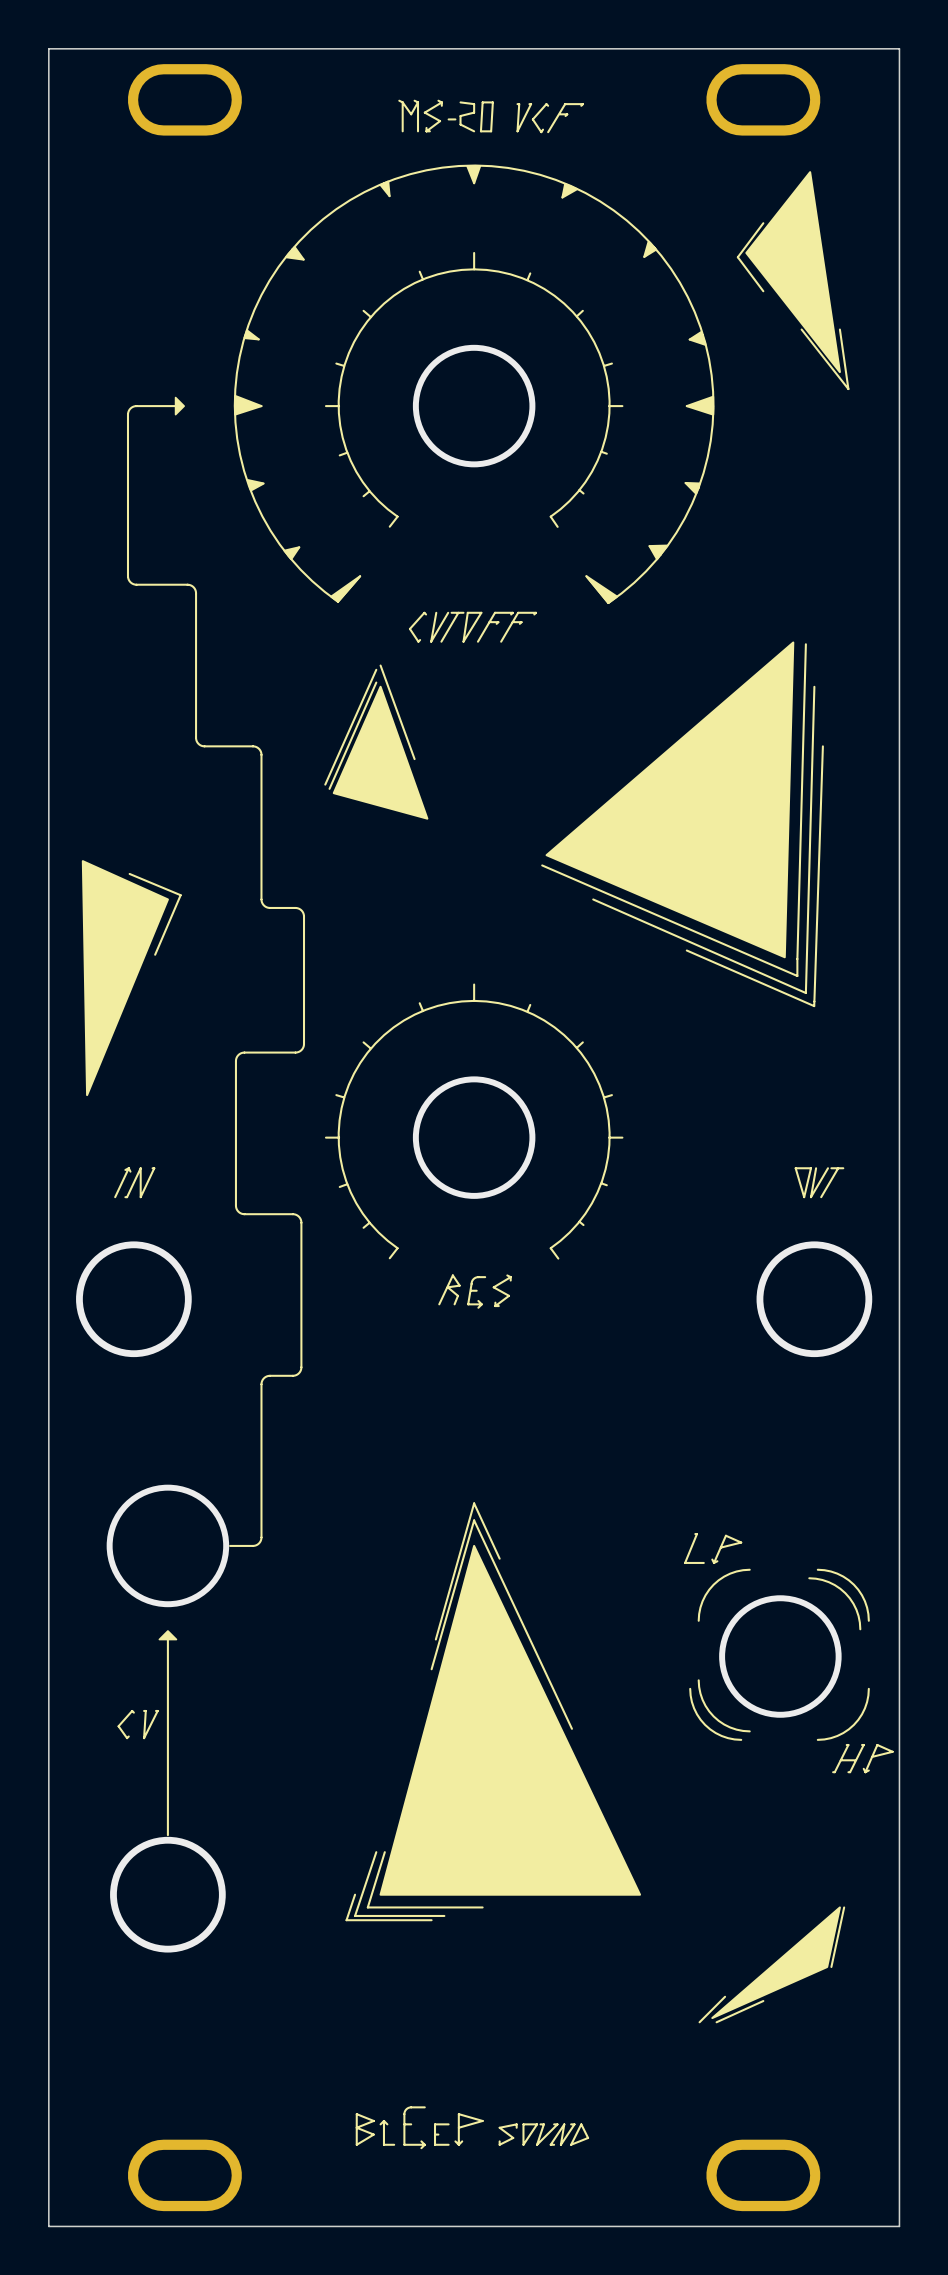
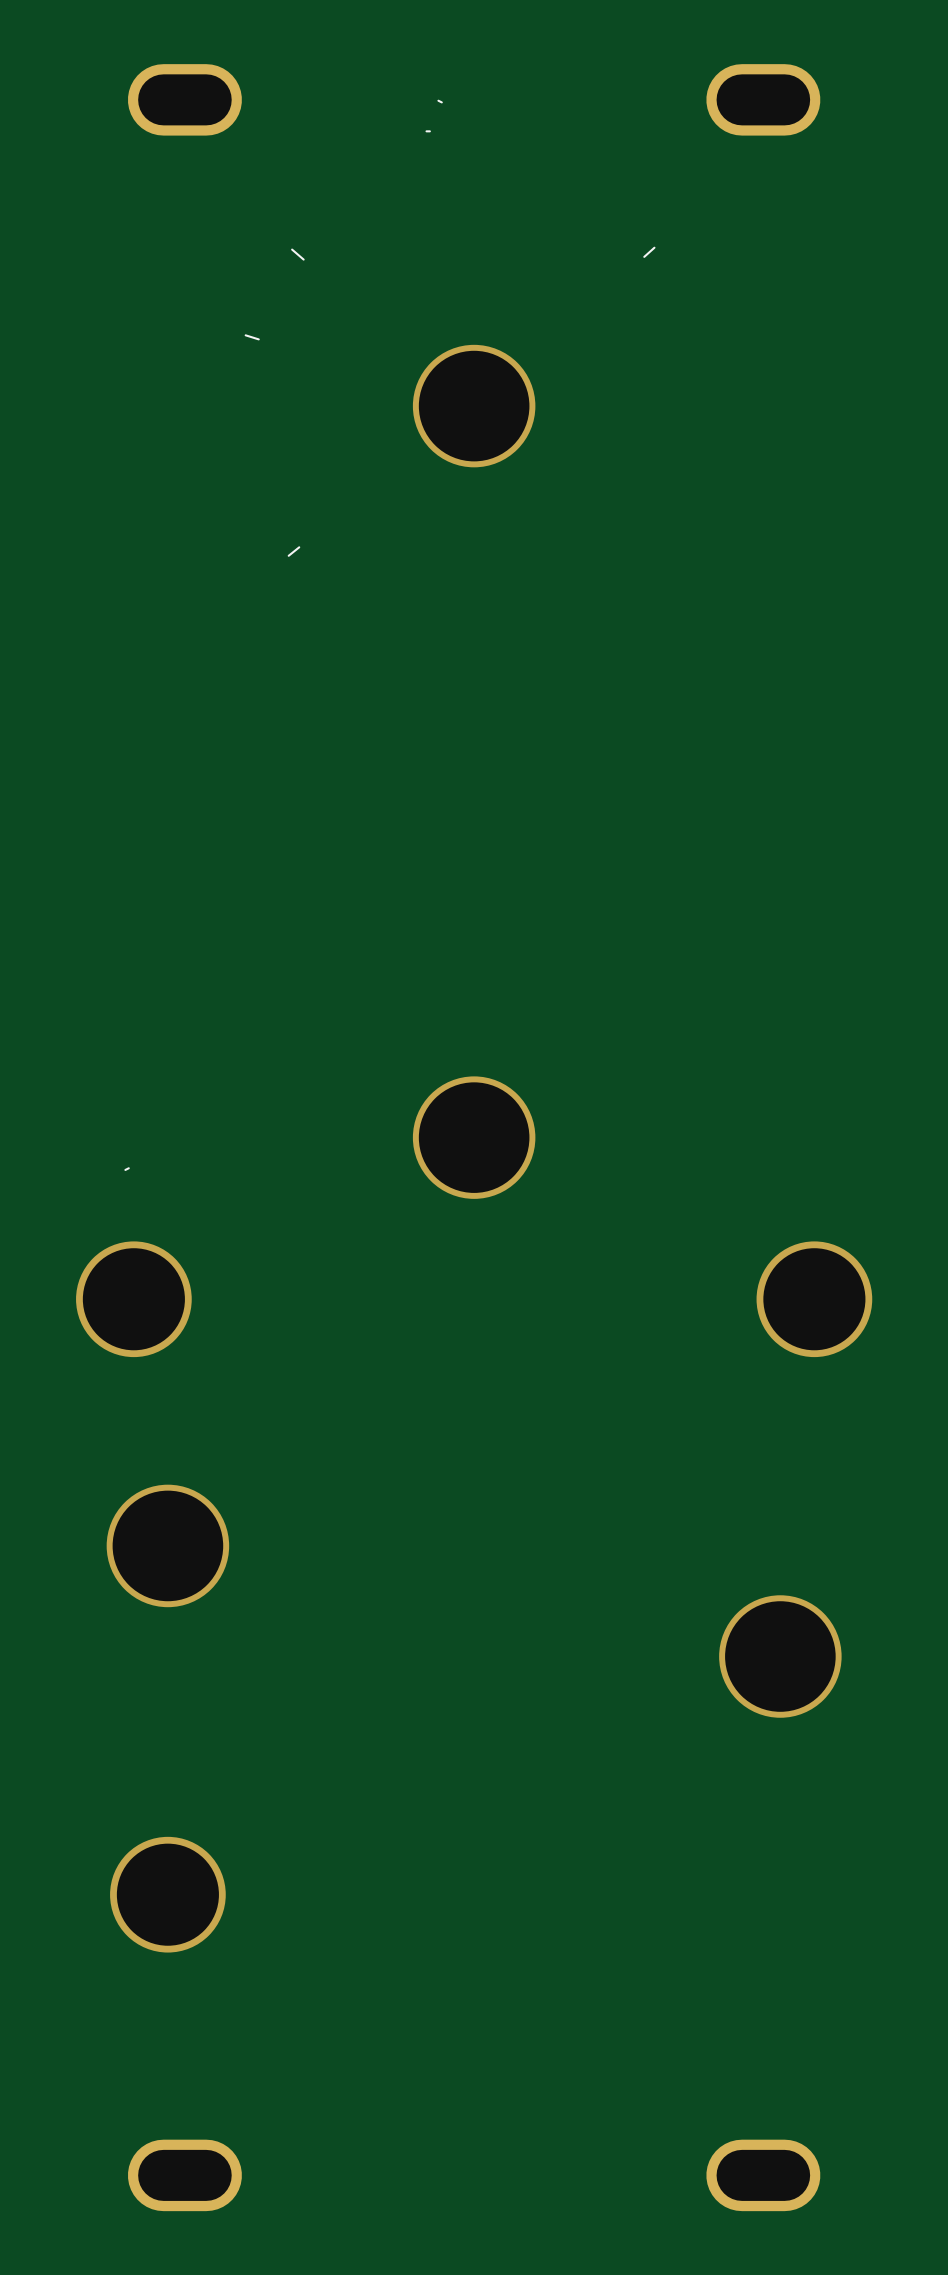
board edge: (48, 48) (48, 2226) (899, 2226) (899, 48) (48, 48) -> none
line: (399, 100) (402, 102) -> none
line: (414, 100) (418, 102) -> none
line: (402, 102) (402, 131) -> none
line: (402, 102) (411, 114) (418, 102) -> none
line: (418, 102) (418, 131) -> none
line: (460, 102) (474, 104) (474, 112) (460, 116) (460, 124) (474, 131) -> none
line: (482, 102) (492, 102) (491, 131) (480, 131) (482, 102) -> none
line: (517, 104) (519, 104) (517, 131) (531, 104) (529, 104) -> none
line: (441, 105) (441, 102) (424, 112) (440, 121) (426, 131) (426, 127) -> none
line: (548, 105) (546, 104) (532, 119) (541, 132) (543, 129) -> none
line: (581, 105) (583, 104) (565, 104) (548, 132) -> none
line: (560, 114) (567, 114) (565, 116) -> none
line: (448, 119) (455, 119) -> none
drawing: [466, 165, 482, 185] -> none
drawing: [745, 171, 841, 374] -> none
drawing: [379, 180, 391, 198] -> none
drawing: [561, 183, 579, 199] -> none
line: (763, 223) (737, 257) (763, 291) -> none
drawing: [643, 240, 658, 258] -> none
drawing: [285, 246, 305, 261] -> none
line: (474, 252) (474, 269) -> none
line: (419, 271) (422, 279) -> none
line: (530, 273) (527, 279) -> none
line: (363, 310) (370, 316) -> none
line: (582, 310) (576, 316) -> none
drawing: [243, 329, 260, 341] -> none
line: (801, 329) (848, 389) (839, 329) -> none
drawing: [688, 331, 707, 346] -> none
line: (336, 363) (344, 365) -> none
line: (611, 363) (604, 365) -> none
drawing: [234, 394, 263, 416] -> none
drawing: [685, 395, 715, 416] -> none
drawing: [174, 396, 185, 416] -> none
line: (175, 406) (135, 406) (128, 412) (128, 578) (135, 584) (188, 584) (194, 588) (196, 740) (203, 746) (254, 746) (260, 750) (261, 901) (268, 907) (298, 908) (304, 916) (303, 1047) (296, 1052) (243, 1052) (238, 1055) (236, 1059) (236, 1207) (243, 1214) (294, 1214) (300, 1219) (301, 1367) (296, 1375) (268, 1375) (262, 1381) (261, 1538) (255, 1545) (230, 1545) -> none
line: (325, 406) (339, 406) -> none
line: (609, 406) (622, 406) -> none
line: (601, 451) (606, 453) -> none
line: (347, 452) (339, 455) -> none
drawing: [246, 479, 265, 492] -> none
drawing: [684, 481, 701, 495] -> none
line: (579, 490) (583, 493) -> none
line: (369, 491) (363, 496) -> none
line: (389, 526) (397, 516) (378, 501) (362, 482) (350, 460) (342, 437) (338, 401) (344, 364) (360, 331) (375, 312) (393, 295) (426, 278) (449, 271) (474, 269) (510, 274) (533, 283) (554, 295) (572, 312) (588, 331) (603, 364) (609, 401) (605, 437) (597, 460) (585, 482) (569, 501) (550, 516) (557, 526) -> none
drawing: [648, 544, 669, 561] -> none
drawing: [283, 546, 301, 561] -> none
drawing: [330, 575, 362, 603] -> none
drawing: [585, 575, 619, 605] -> none
line: (360, 576) (338, 601) (300, 569) (279, 544) (262, 516) (244, 470) (235, 422) (235, 389) (243, 340) (254, 309) (269, 280) (299, 241) (323, 219) (350, 200) (394, 179) (442, 167) (475, 165) (508, 167) (555, 179) (585, 193) (613, 210) (650, 243) (671, 268) (694, 312) (705, 343) (713, 391) (710, 440) (703, 472) (684, 518) (667, 546) (646, 571) (608, 603) (586, 576) -> none
line: (436, 612) (431, 641) (448, 612) -> none
line: (451, 612) (463, 612) -> none
line: (458, 612) (441, 641) -> none
line: (467, 612) (481, 612) (463, 641) (467, 612) -> none
line: (426, 614) (424, 612) (409, 628) (418, 641) (420, 640) -> none
line: (511, 614) (512, 612) (494, 612) (477, 641) -> none
line: (534, 614) (536, 612) (518, 612) (501, 641) -> none
line: (489, 622) (498, 622) (496, 623) -> none
line: (512, 622) (521, 622) (519, 623) -> none
drawing: [545, 641, 795, 959] -> none
line: (805, 644) (797, 976) (542, 865) -> none
line: (380, 665) (414, 759) -> none
line: (376, 669) (325, 784) -> none
line: (376, 682) (329, 788) -> none
drawing: [332, 685, 429, 820] -> none
line: (814, 686) (805, 993) (593, 899) -> none
line: (822, 746) (814, 1006) (686, 950) -> none
drawing: [81, 860, 169, 1097] -> none
line: (129, 873) (180, 895) (155, 954) -> none
line: (474, 984) (474, 1000) -> none
line: (419, 1003) (422, 1010) -> none
line: (530, 1004) (527, 1011) -> none
line: (363, 1042) (370, 1048) -> none
line: (582, 1042) (576, 1047) -> none
line: (336, 1095) (344, 1097) -> none
line: (611, 1095) (604, 1097) -> none
line: (325, 1137) (339, 1137) -> none
line: (609, 1137) (622, 1137) -> none
line: (152, 1168) (154, 1168) (140, 1197) (140, 1168) (127, 1197) (125, 1197) -> none
line: (795, 1168) (810, 1168) (804, 1197) (795, 1168) -> none
line: (816, 1168) (810, 1197) (828, 1168) -> none
line: (831, 1168) (843, 1168) -> none
line: (838, 1168) (821, 1197) -> none
line: (130, 1171) (128, 1168) (115, 1197) -> none
line: (601, 1183) (606, 1185) -> none
line: (347, 1184) (339, 1186) -> none
line: (579, 1221) (583, 1225) -> none
line: (369, 1222) (363, 1227) -> none
line: (389, 1258) (397, 1248) (378, 1232) (362, 1213) (350, 1192) (342, 1169) (338, 1132) (344, 1096) (354, 1073) (367, 1052) (393, 1027) (414, 1014) (437, 1005) (474, 1000) (510, 1005) (533, 1014) (554, 1027) (580, 1052) (594, 1073) (603, 1096) (609, 1132) (605, 1169) (597, 1192) (585, 1213) (569, 1232) (550, 1248) (558, 1258) -> none
line: (507, 1275) (510, 1277) -> none
line: (485, 1277) (476, 1277) (471, 1282) (468, 1304) (480, 1304) -> none
line: (510, 1277) (493, 1287) (509, 1295) (495, 1306) -> none
line: (510, 1277) (510, 1280) -> none
line: (471, 1290) (476, 1290) -> none
line: (478, 1300) (481, 1304) (478, 1307) -> none
line: (495, 1302) (495, 1306) -> none
line: (439, 1304) (452, 1275) (459, 1285) (447, 1287) (457, 1295) (454, 1304) -> none
line: (495, 1306) (498, 1306) -> none
line: (695, 1534) (697, 1534) (685, 1562) (703, 1562) -> none
drawing: [379, 1544, 642, 1896] -> none
line: (720, 1547) (741, 1542) (725, 1535) (714, 1562) -> none
line: (499, 1558) (474, 1503) (435, 1639) -> none
line: (712, 1559) (714, 1562) -> none
line: (717, 1561) (714, 1562) -> none
line: (749, 1569) (730, 1573) (713, 1584) (702, 1601) (698, 1620) -> none
line: (817, 1569) (837, 1573) (853, 1584) (864, 1601) (868, 1620) -> none
line: (809, 1578) (828, 1582) (845, 1593) (856, 1609) (860, 1629) -> none
drawing: [158, 1630, 178, 1641] -> none
line: (167, 1639) (167, 1835) -> none
line: (431, 1669) (474, 1520) (571, 1728) -> none
line: (698, 1680) (702, 1699) (713, 1716) (730, 1727) (749, 1731) -> none
line: (690, 1688) (694, 1708) (705, 1724) (721, 1735) (741, 1739) -> none
line: (868, 1688) (864, 1708) (853, 1724) (837, 1735) (817, 1739) -> none
line: (144, 1710) (145, 1710) (144, 1738) (157, 1710) (156, 1710) -> none
line: (133, 1712) (132, 1710) (118, 1726) (127, 1738) (128, 1736) -> none
line: (846, 1744) (848, 1744) (833, 1772) -> none
line: (862, 1744) (863, 1744) (848, 1772) -> none
line: (872, 1756) (892, 1751) (877, 1744) (865, 1772) -> none
line: (840, 1760) (855, 1760) -> none
line: (863, 1768) (865, 1772) -> none
line: (868, 1770) (865, 1772) -> none
line: (376, 1852) (355, 1915) (444, 1915) -> none
line: (384, 1852) (367, 1907) (482, 1907) -> none
line: (355, 1894) (346, 1920) (431, 1920) -> none
drawing: [711, 1906, 841, 2020] -> none
line: (844, 1907) (831, 1967) -> none
line: (725, 1996) (699, 2022) -> none
line: (763, 2001) (716, 2022) -> none
line: (424, 2107) (408, 2107) (404, 2114) (404, 2144) (424, 2144) -> none
line: (356, 2114) (373, 2120) (356, 2127) (373, 2134) (356, 2144) (356, 2114) -> none
line: (383, 2120) (383, 2144) (394, 2144) -> none
line: (383, 2120) (387, 2124) -> none
line: (383, 2120) (380, 2124) -> none
line: (404, 2124) (411, 2124) -> none
line: (448, 2124) (435, 2124) (435, 2144) (448, 2144) -> none
line: (523, 2124) (537, 2124) (523, 2144) (523, 2124) -> none
line: (540, 2124) (543, 2124) (537, 2144) (557, 2124) (554, 2124) -> none
line: (571, 2124) (574, 2124) (560, 2144) (564, 2124) (550, 2144) (554, 2144) -> none
line: (581, 2124) (588, 2137) (571, 2144) (581, 2124) -> none
line: (458, 2127) (482, 2120) (458, 2114) (458, 2144) -> none
line: (516, 2127) (516, 2124) (499, 2127) (513, 2137) (499, 2144) (499, 2141) -> none
line: (435, 2134) (438, 2134) -> none
line: (421, 2141) (424, 2144) -> none
line: (455, 2141) (458, 2144) -> none
line: (462, 2141) (458, 2144) -> none
line: (424, 2144) (421, 2148) -> none

